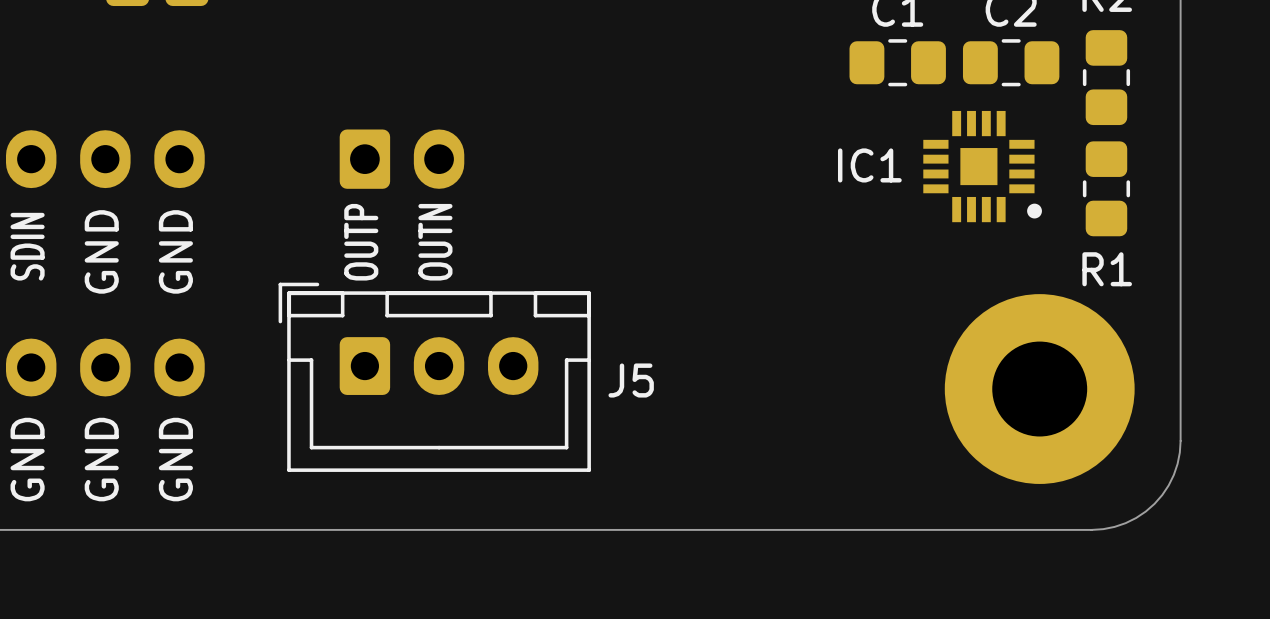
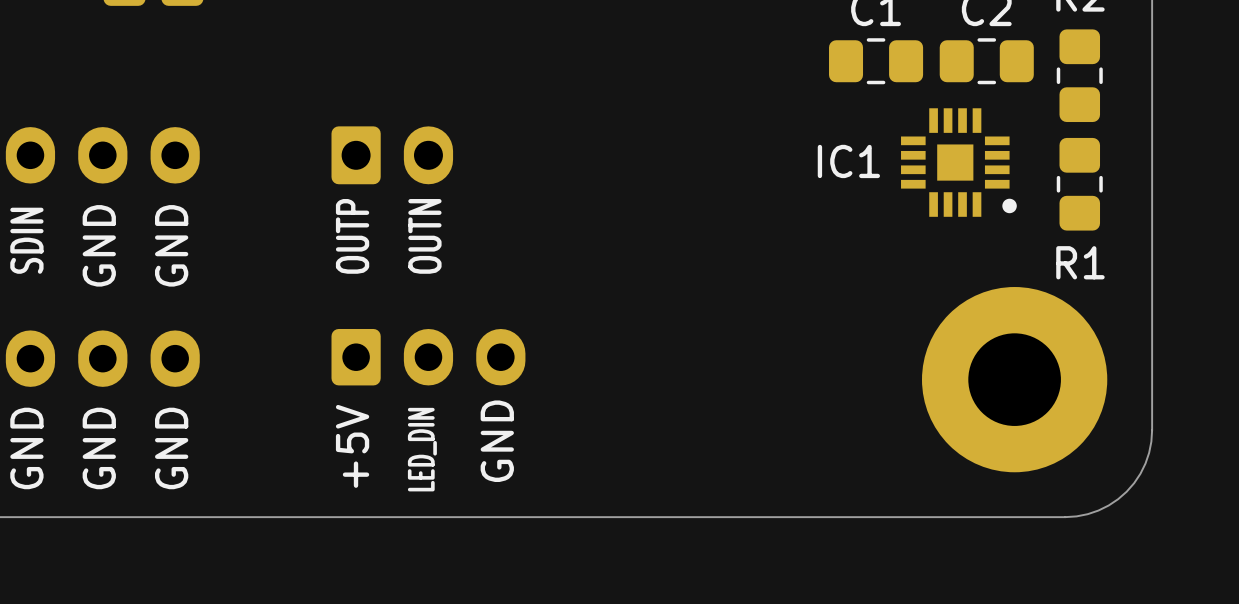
J5 side: top (434, 377) -> bottom (428, 357)
text: none -> GND (497, 441)
text: none -> +5V (352, 446)
text: none -> LED_DIN (422, 449)

